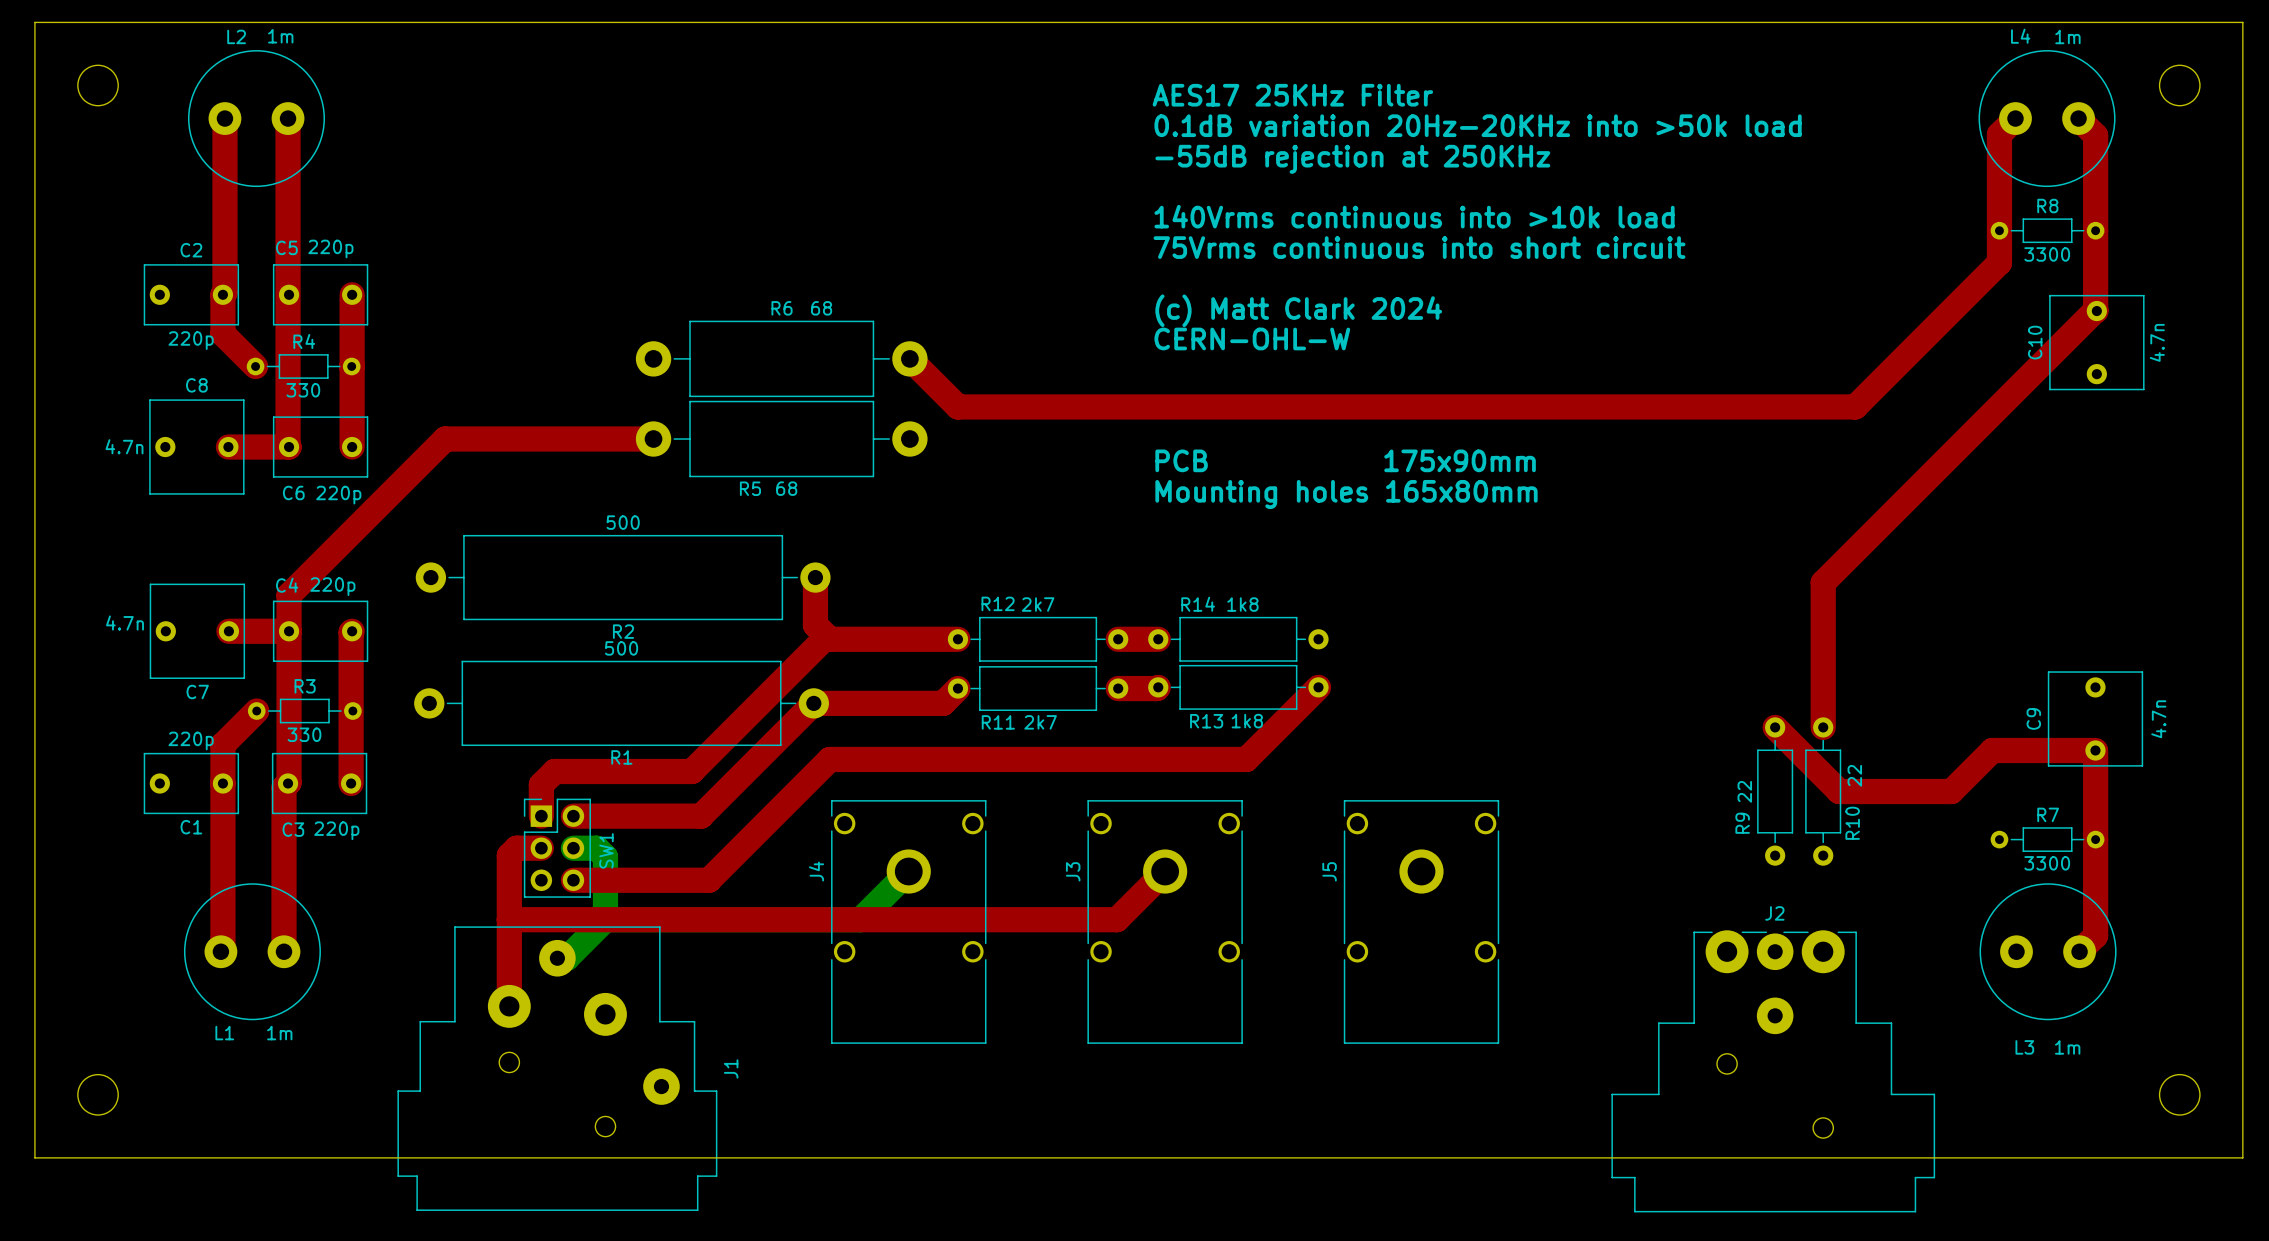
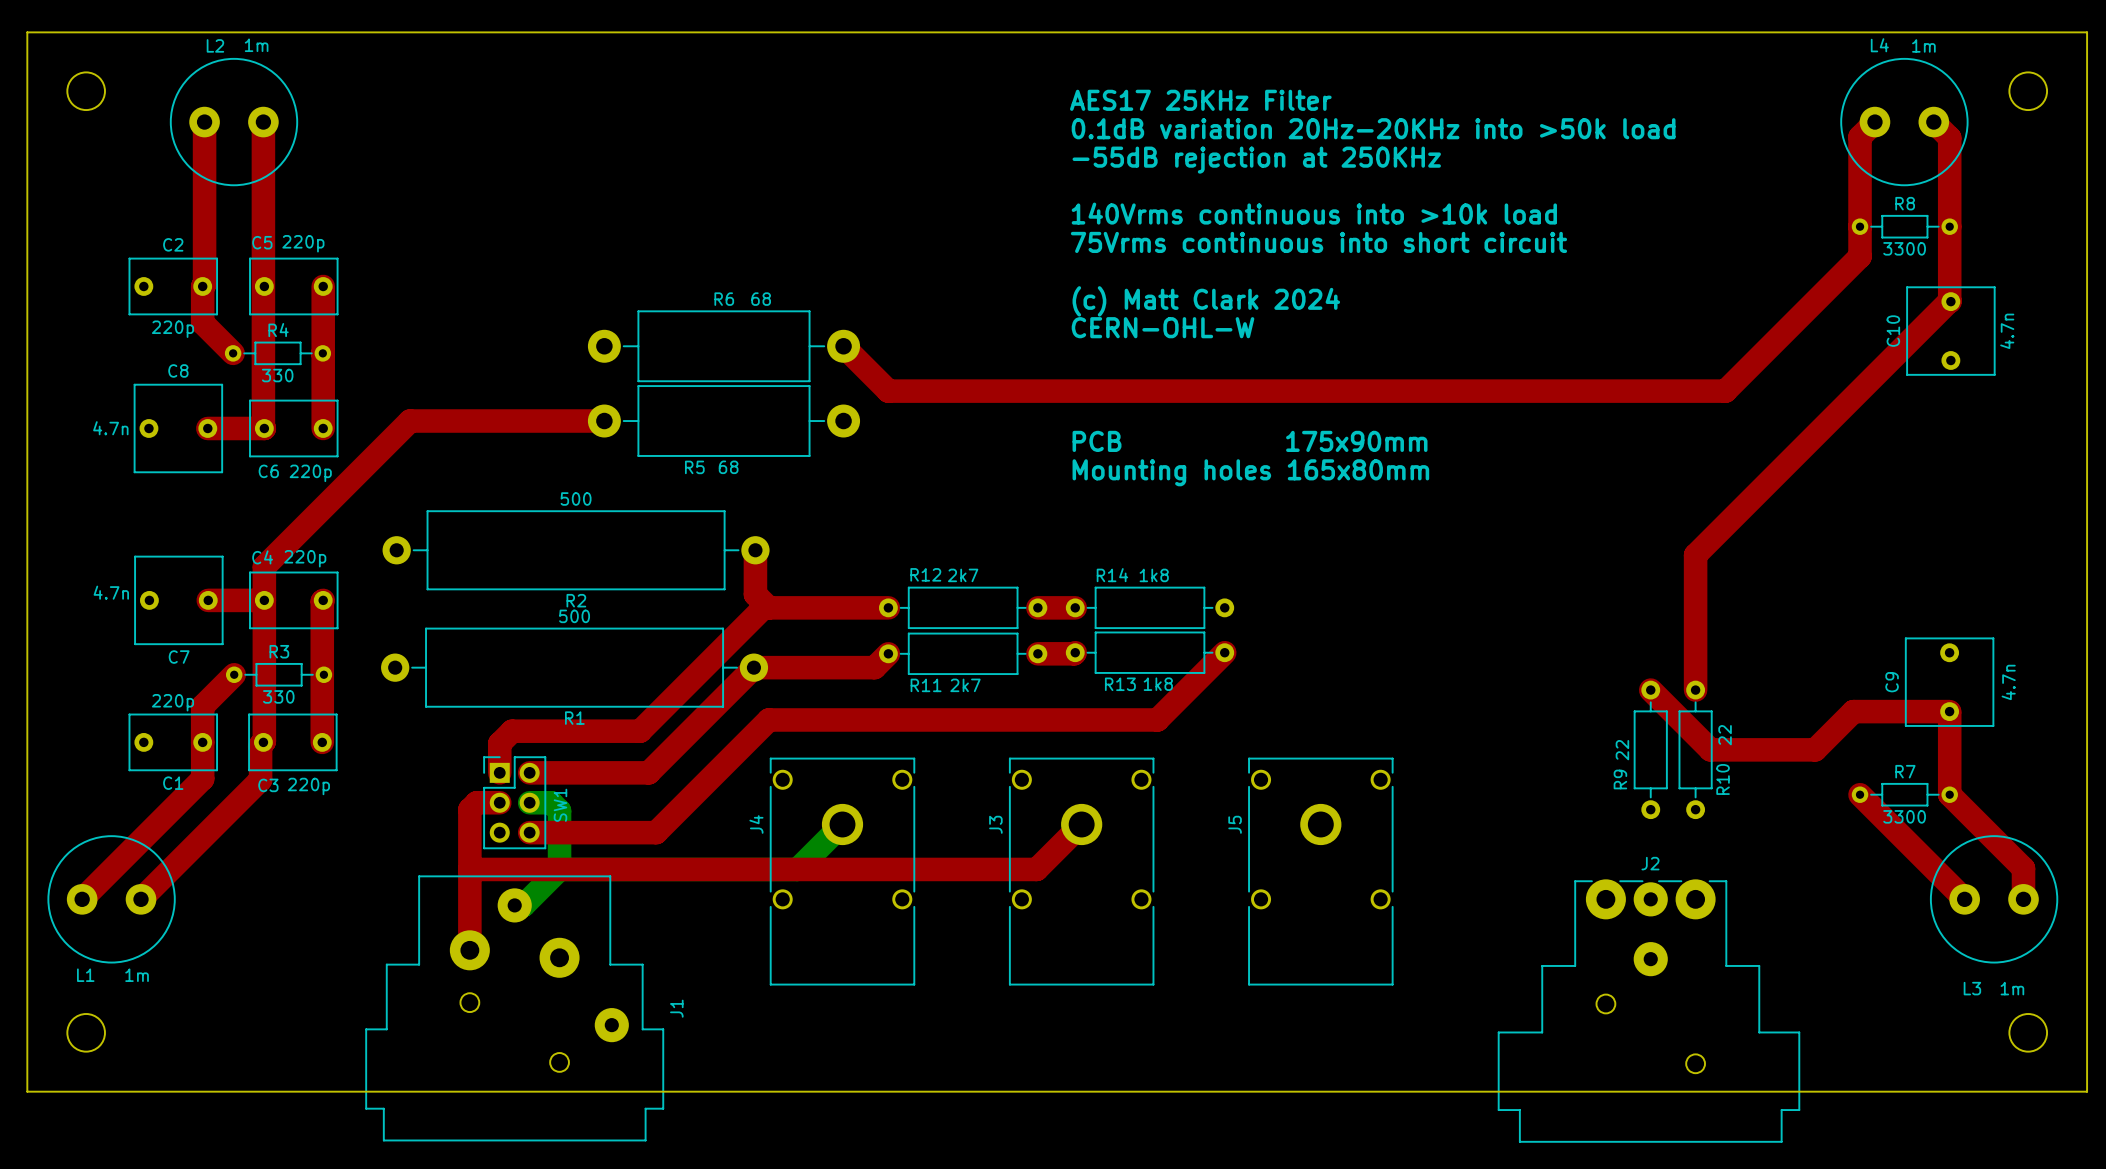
top track: none -> (260, 745) (260, 779) (141, 899)
top track: (284, 787) (284, 951) -> none
top track: (222, 822) (222, 949) (220, 951) -> (202, 778) (82, 899)
top track: none -> (1860, 794) (1964, 899)
top track: (2095, 839) (2095, 935) (2079, 951) -> (1949, 794) (2023, 868) (2023, 899)
L1 position: (252, 951) -> (111, 899)
L3 position: (2048, 951) -> (1994, 899)

